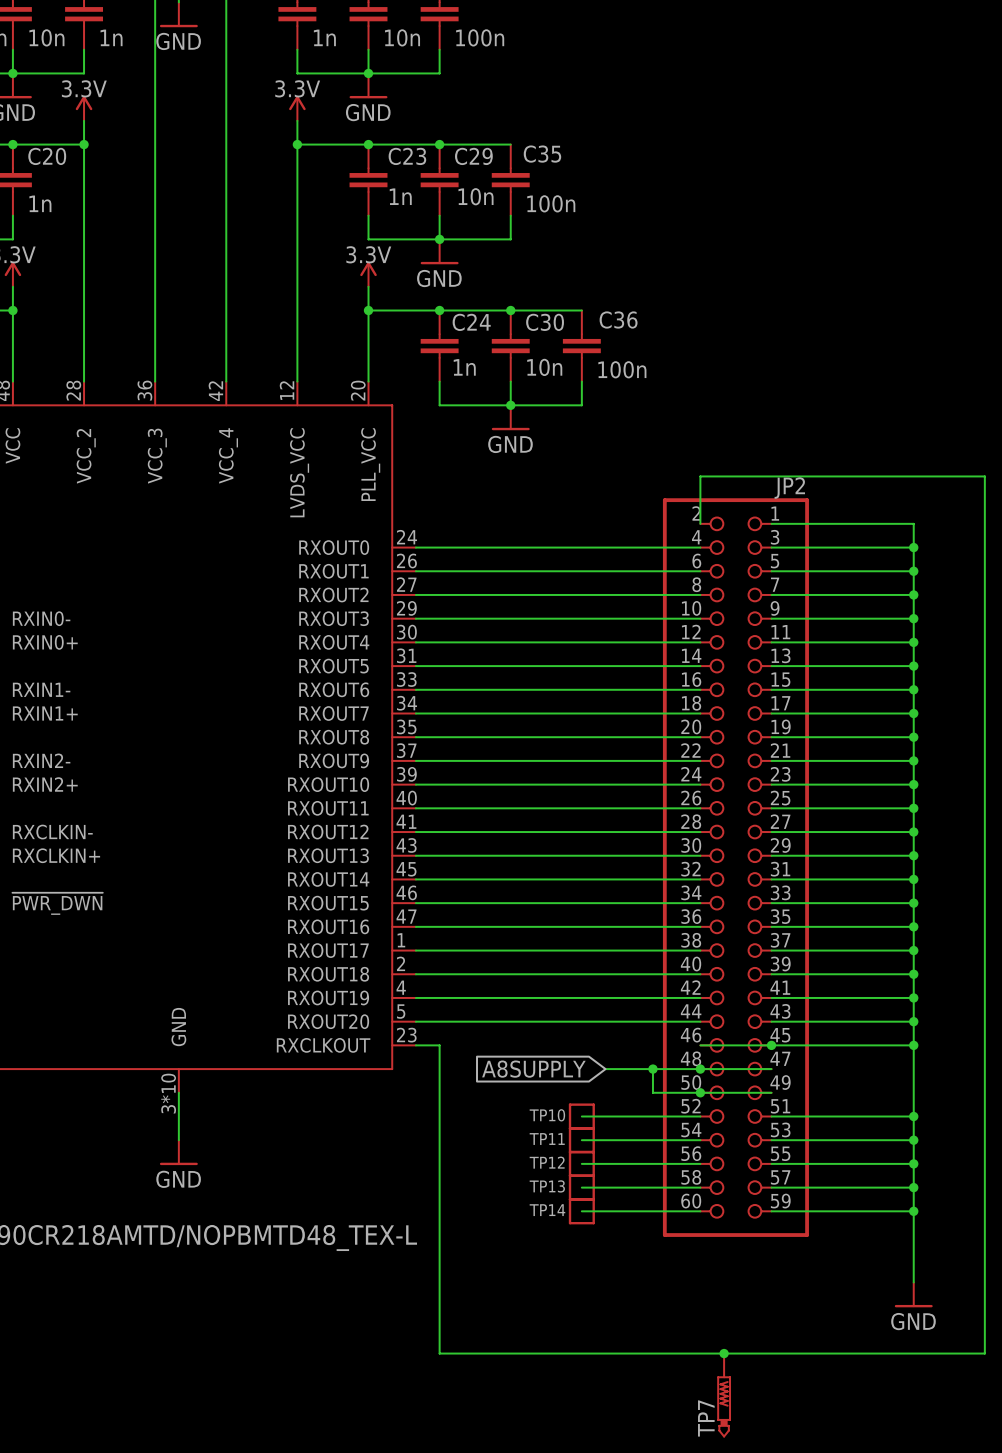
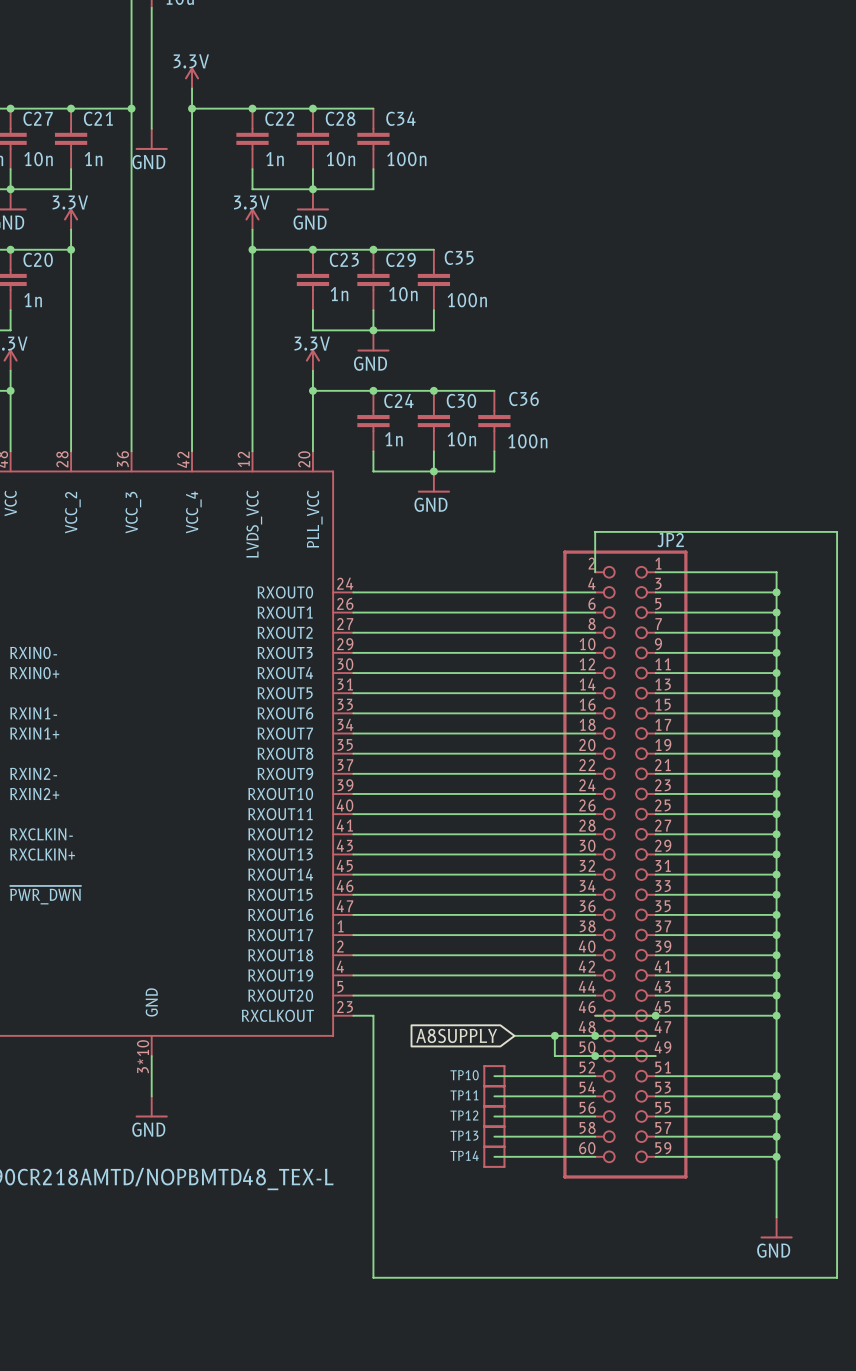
junction: (724, 1353) -> none
TP7: (724, 1395) -> none

